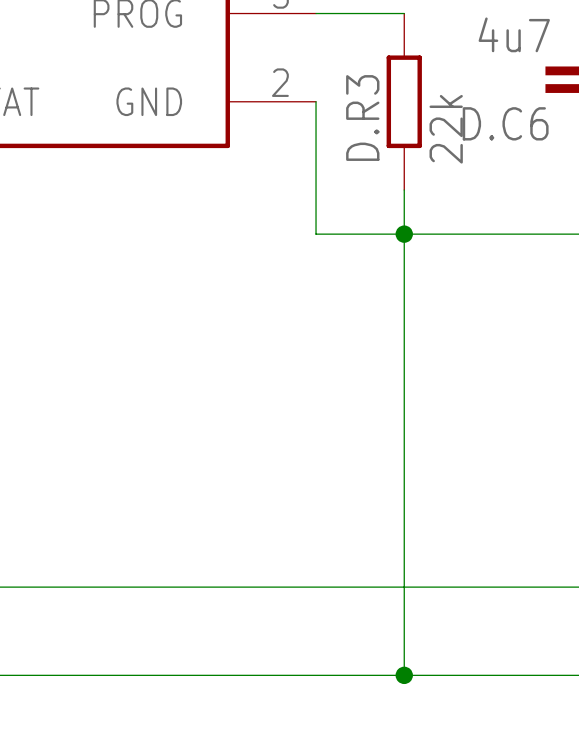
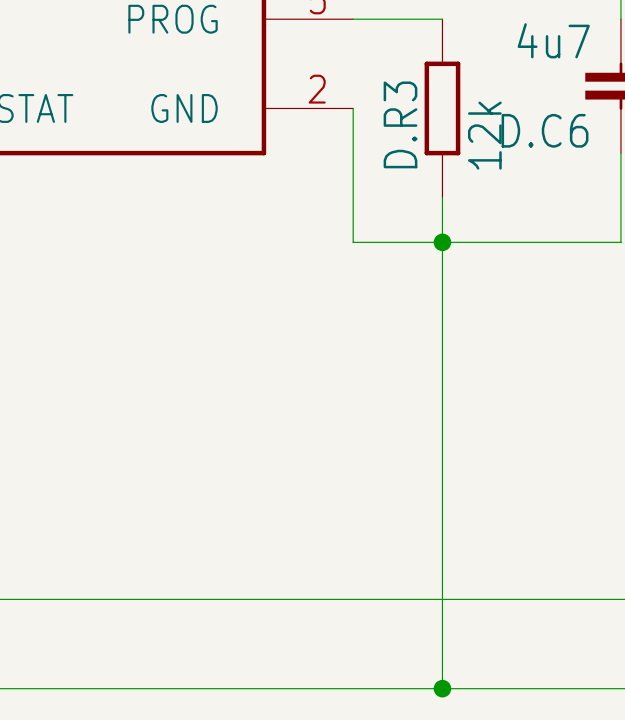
D.R3 value: 22k (446, 129) -> 12k (484, 135)

